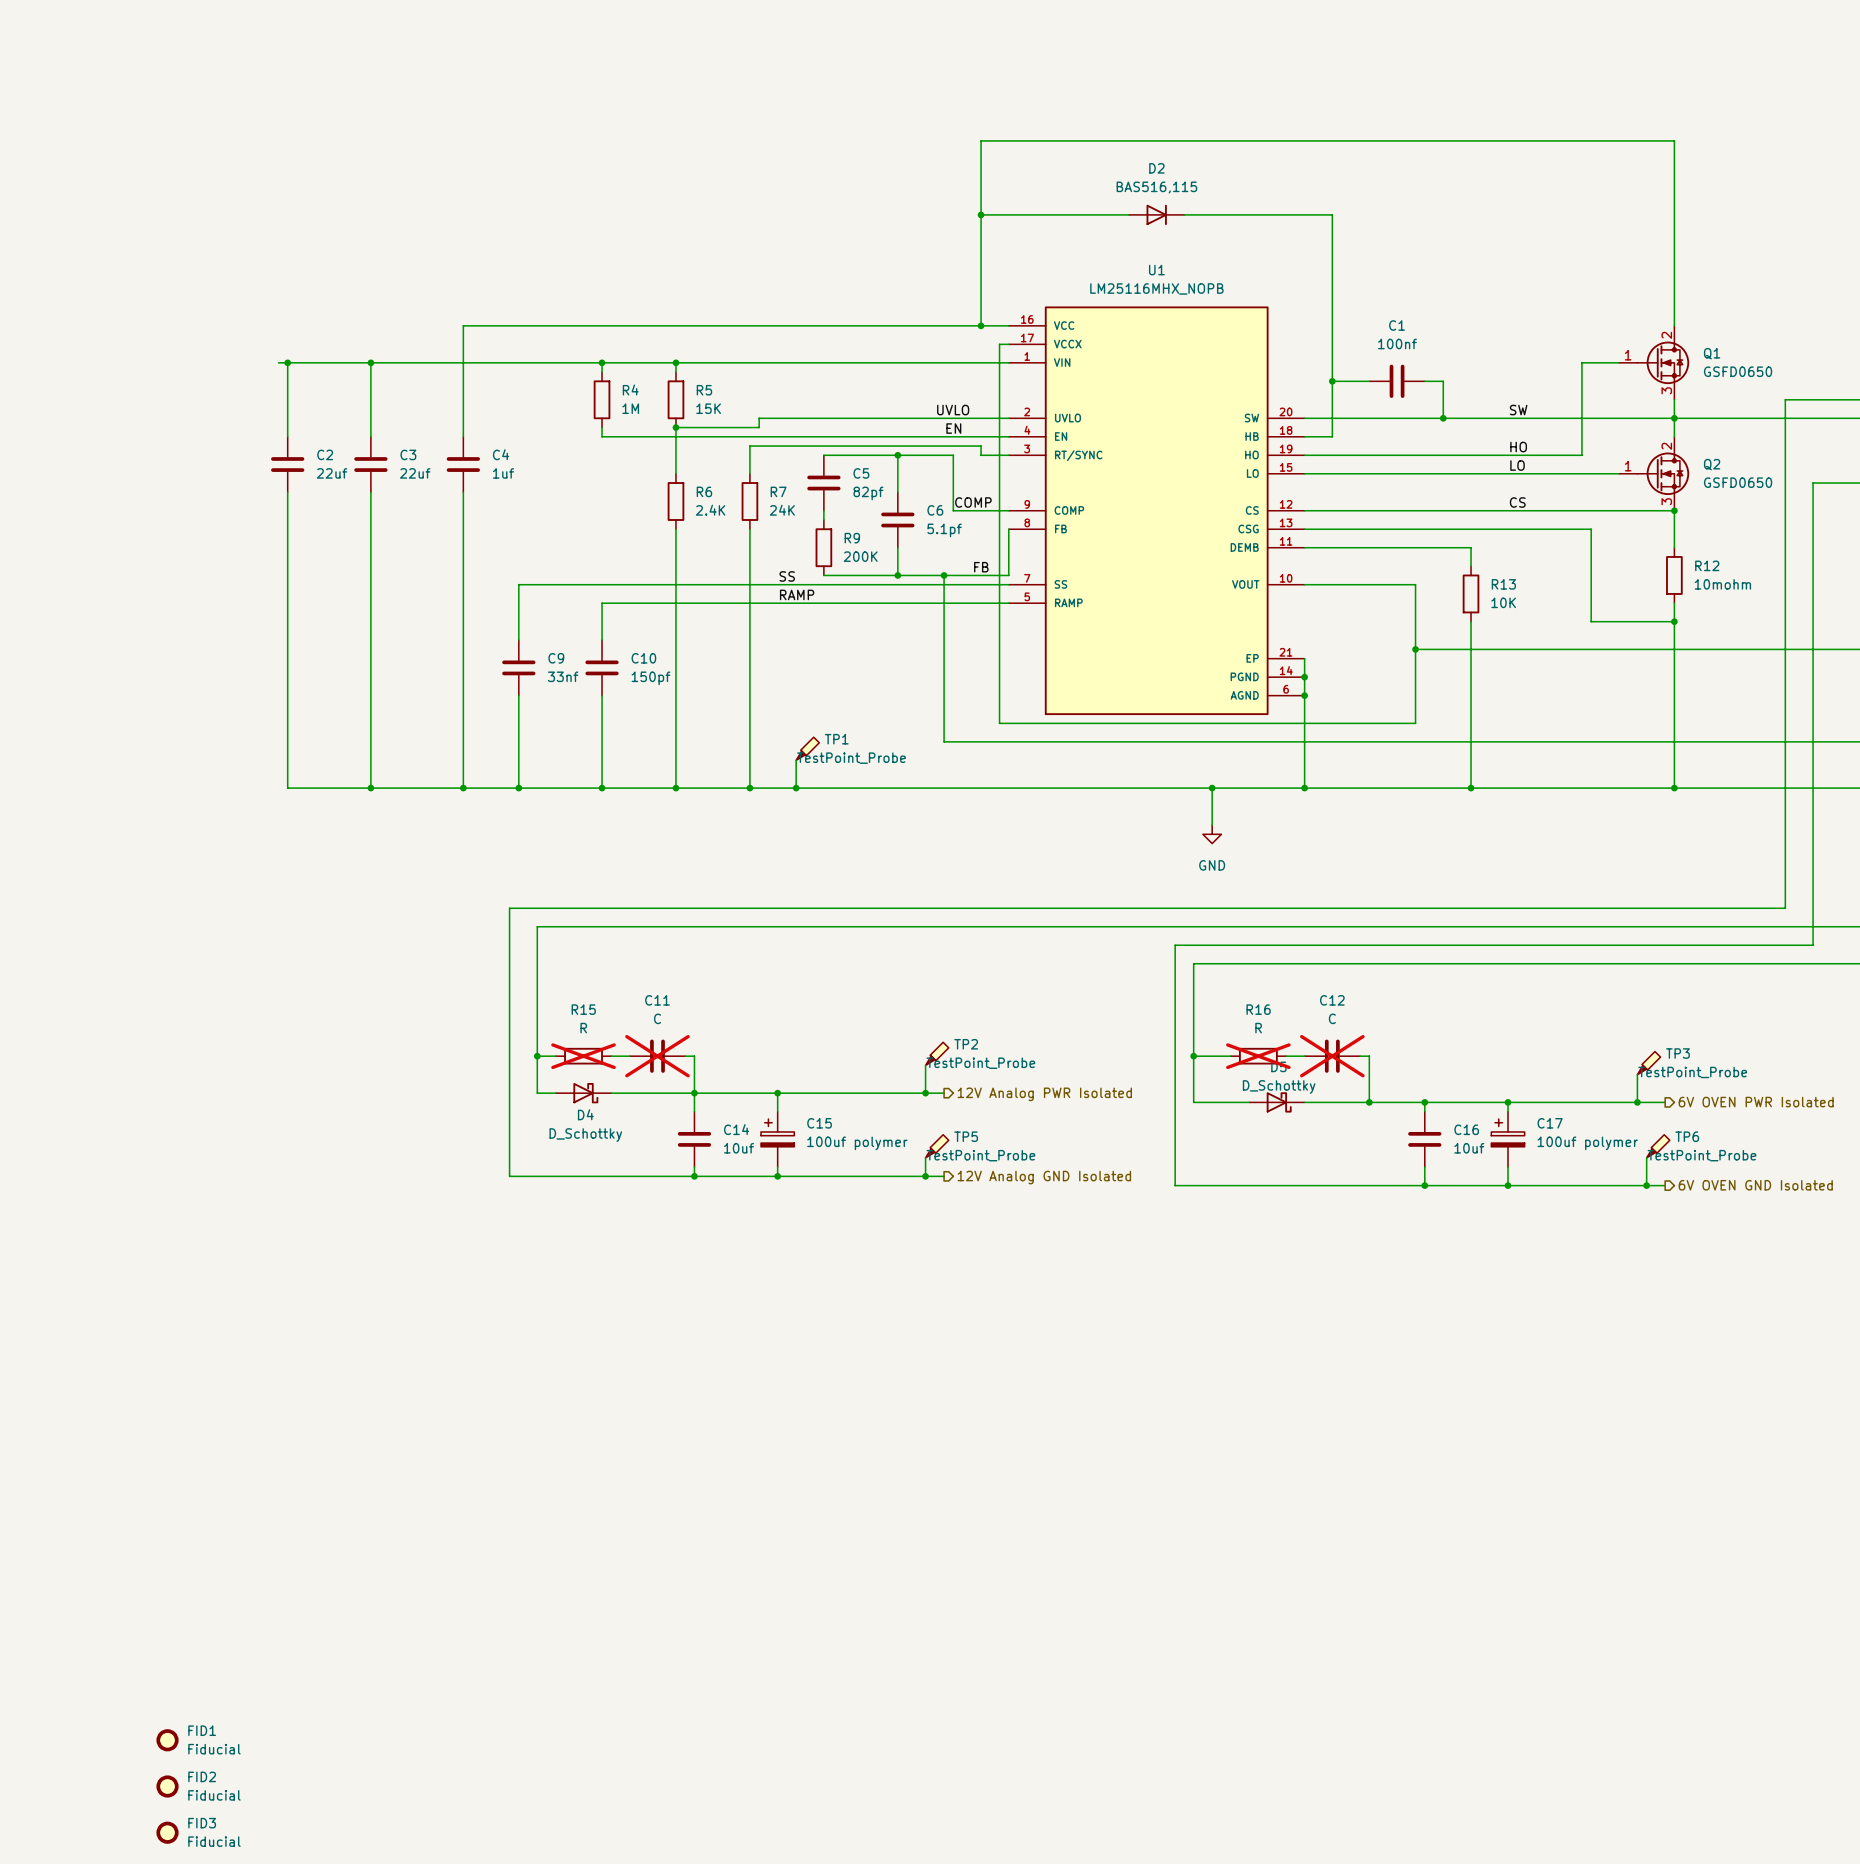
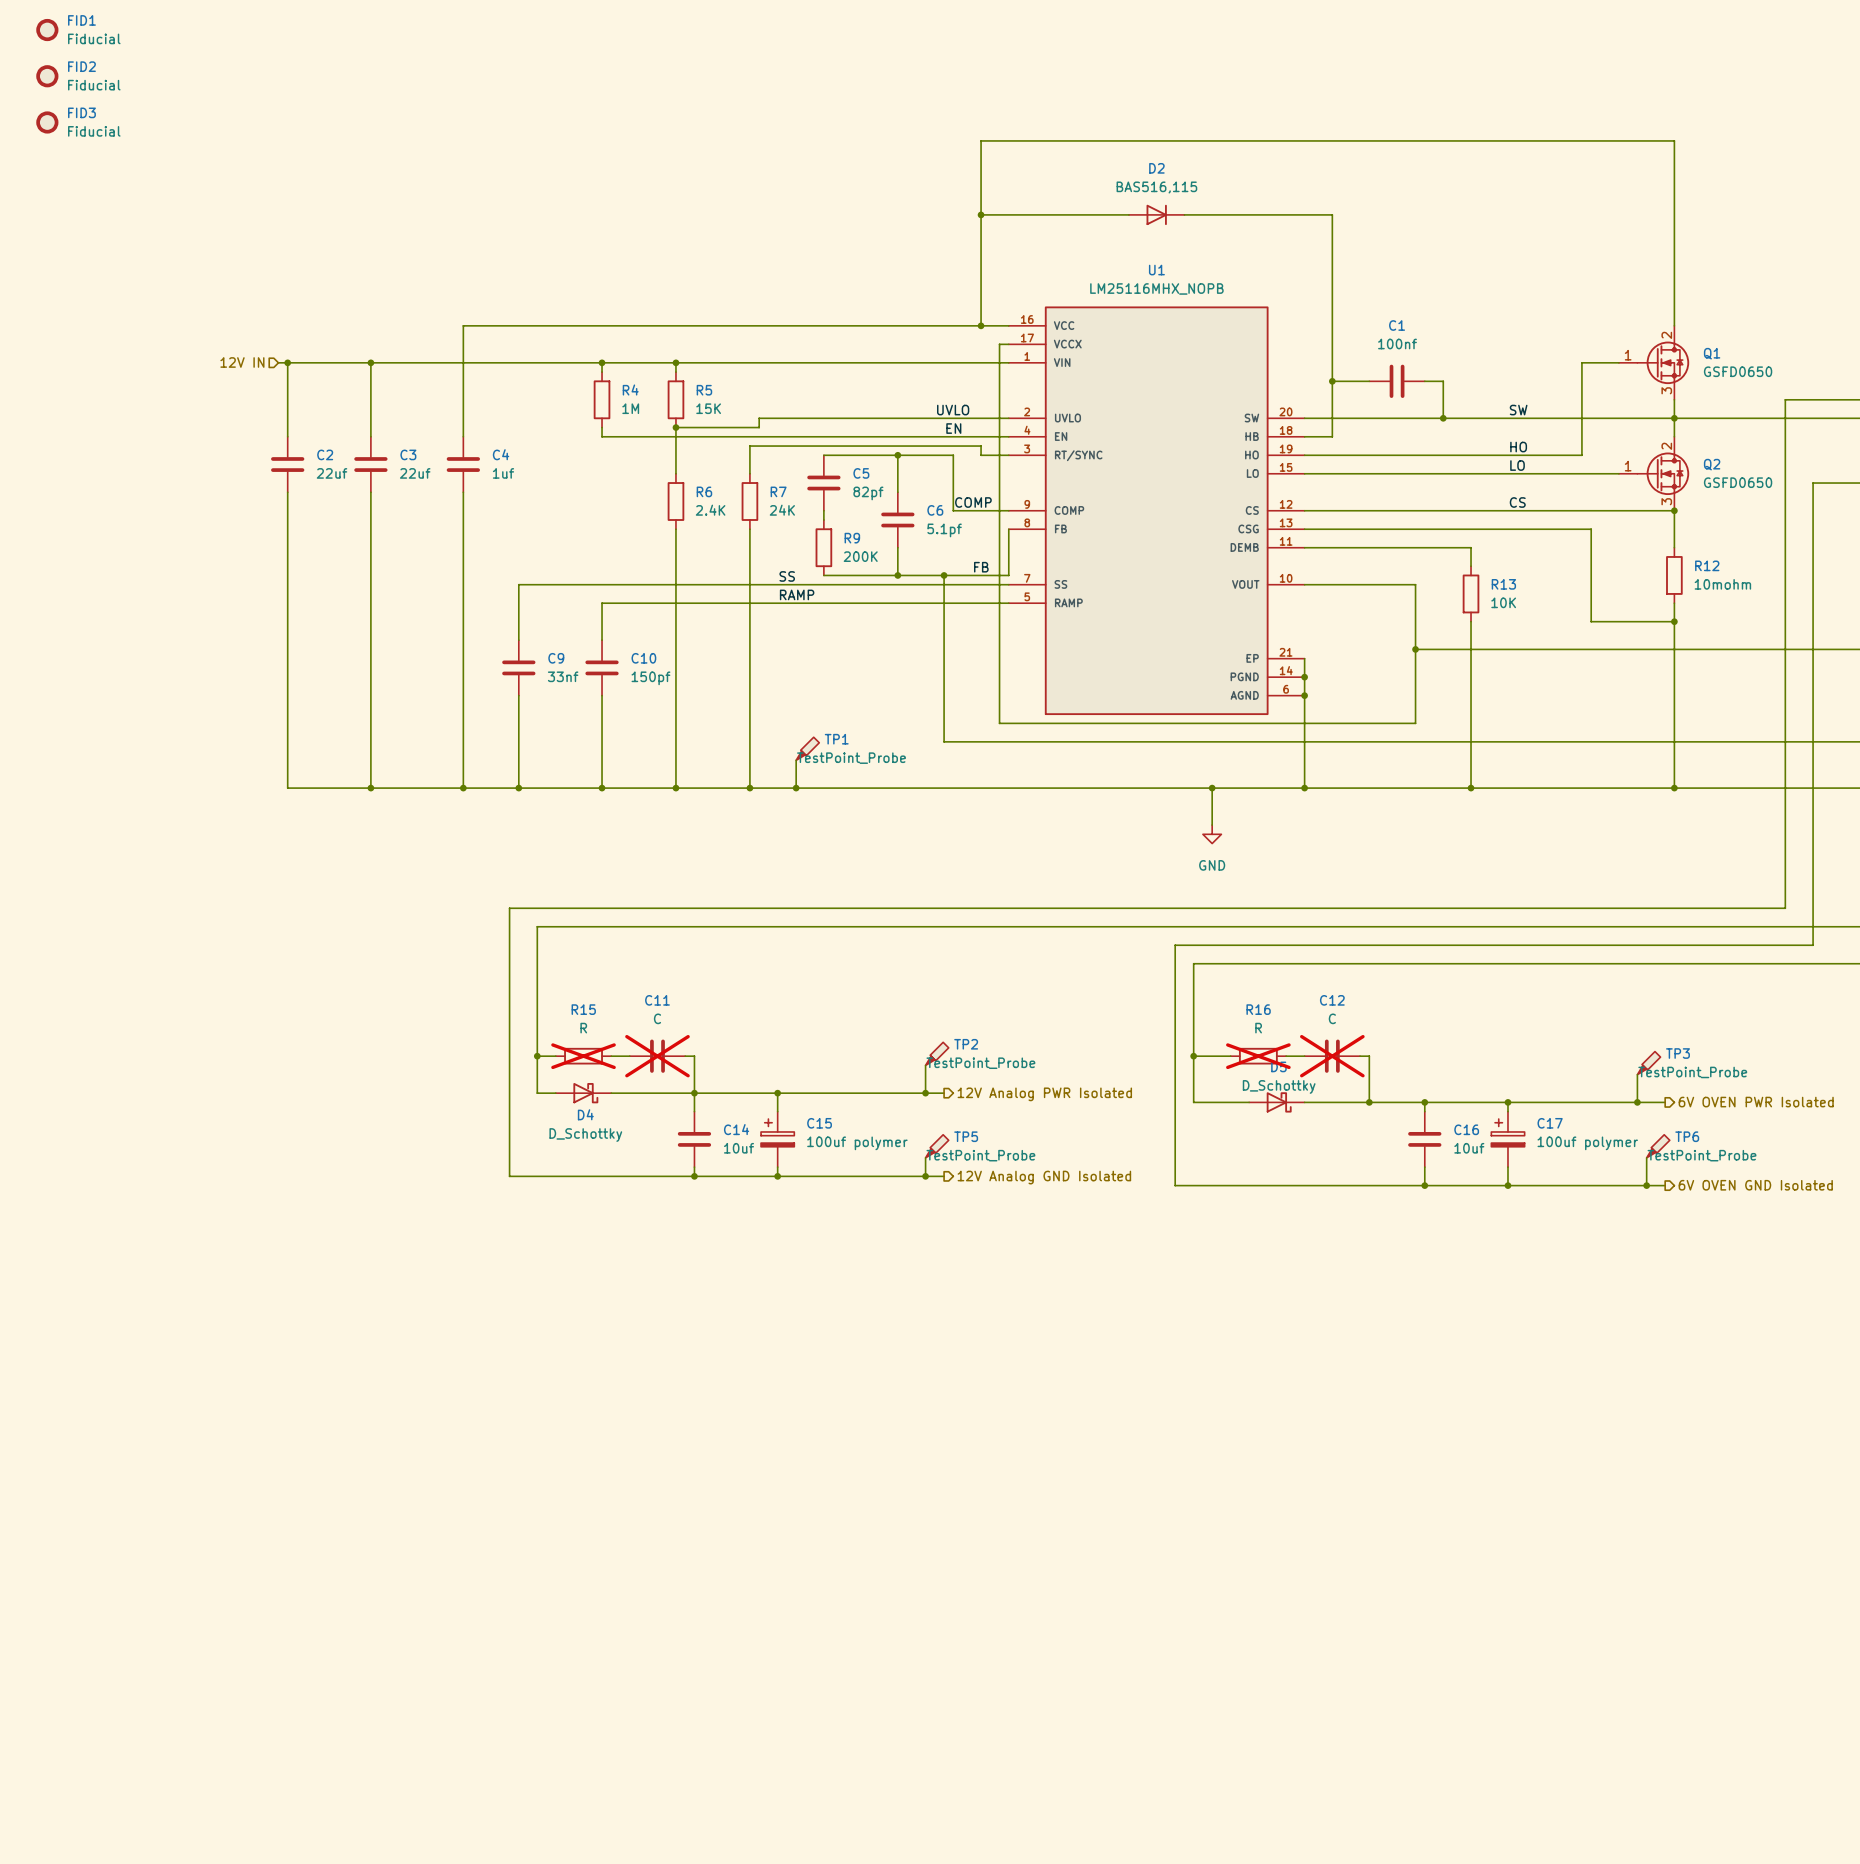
hierarchical label: none -> 12V IN (242, 362)
FID1 position: (167, 1740) -> (47, 30)
FID2 position: (167, 1786) -> (47, 76)
FID3 position: (167, 1832) -> (47, 122)

